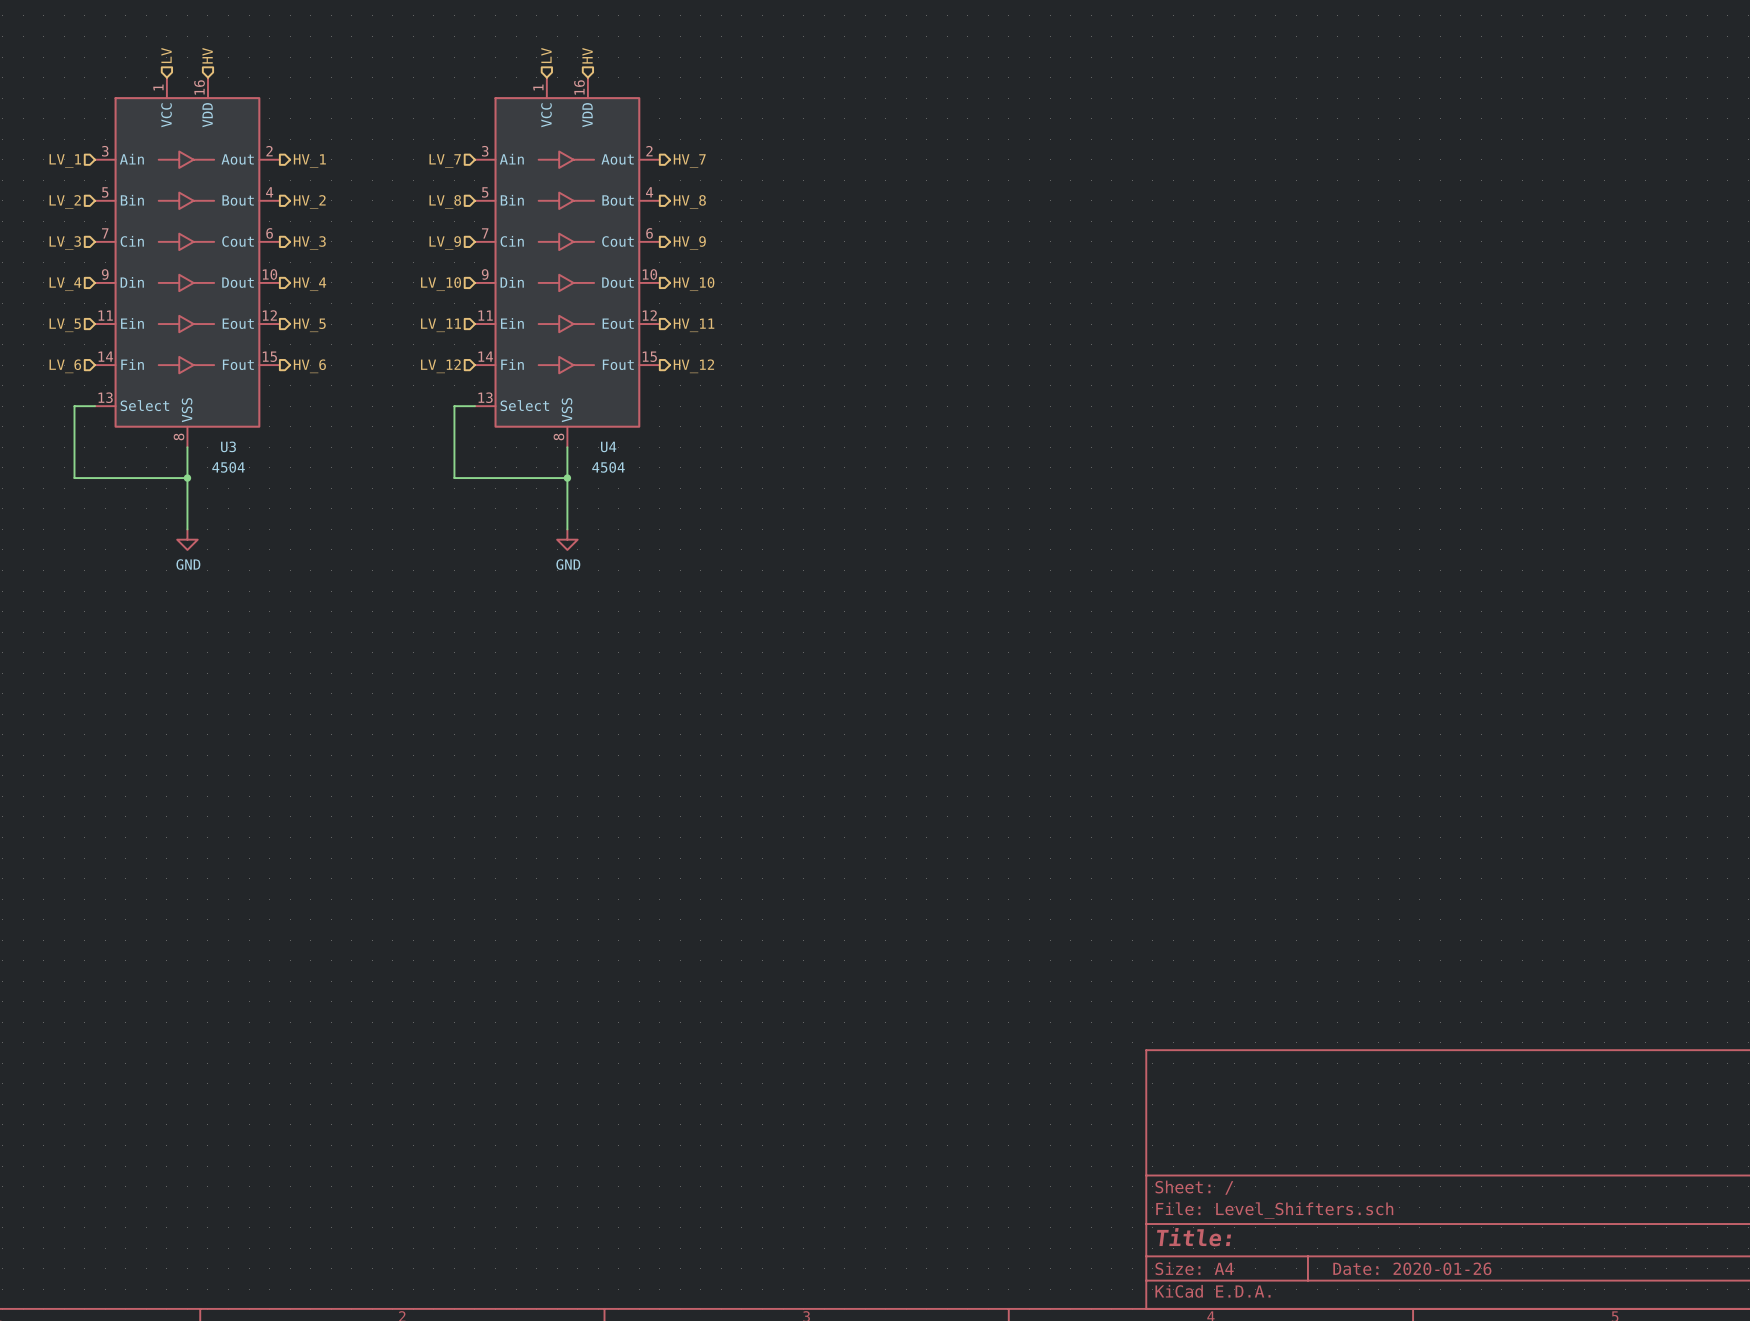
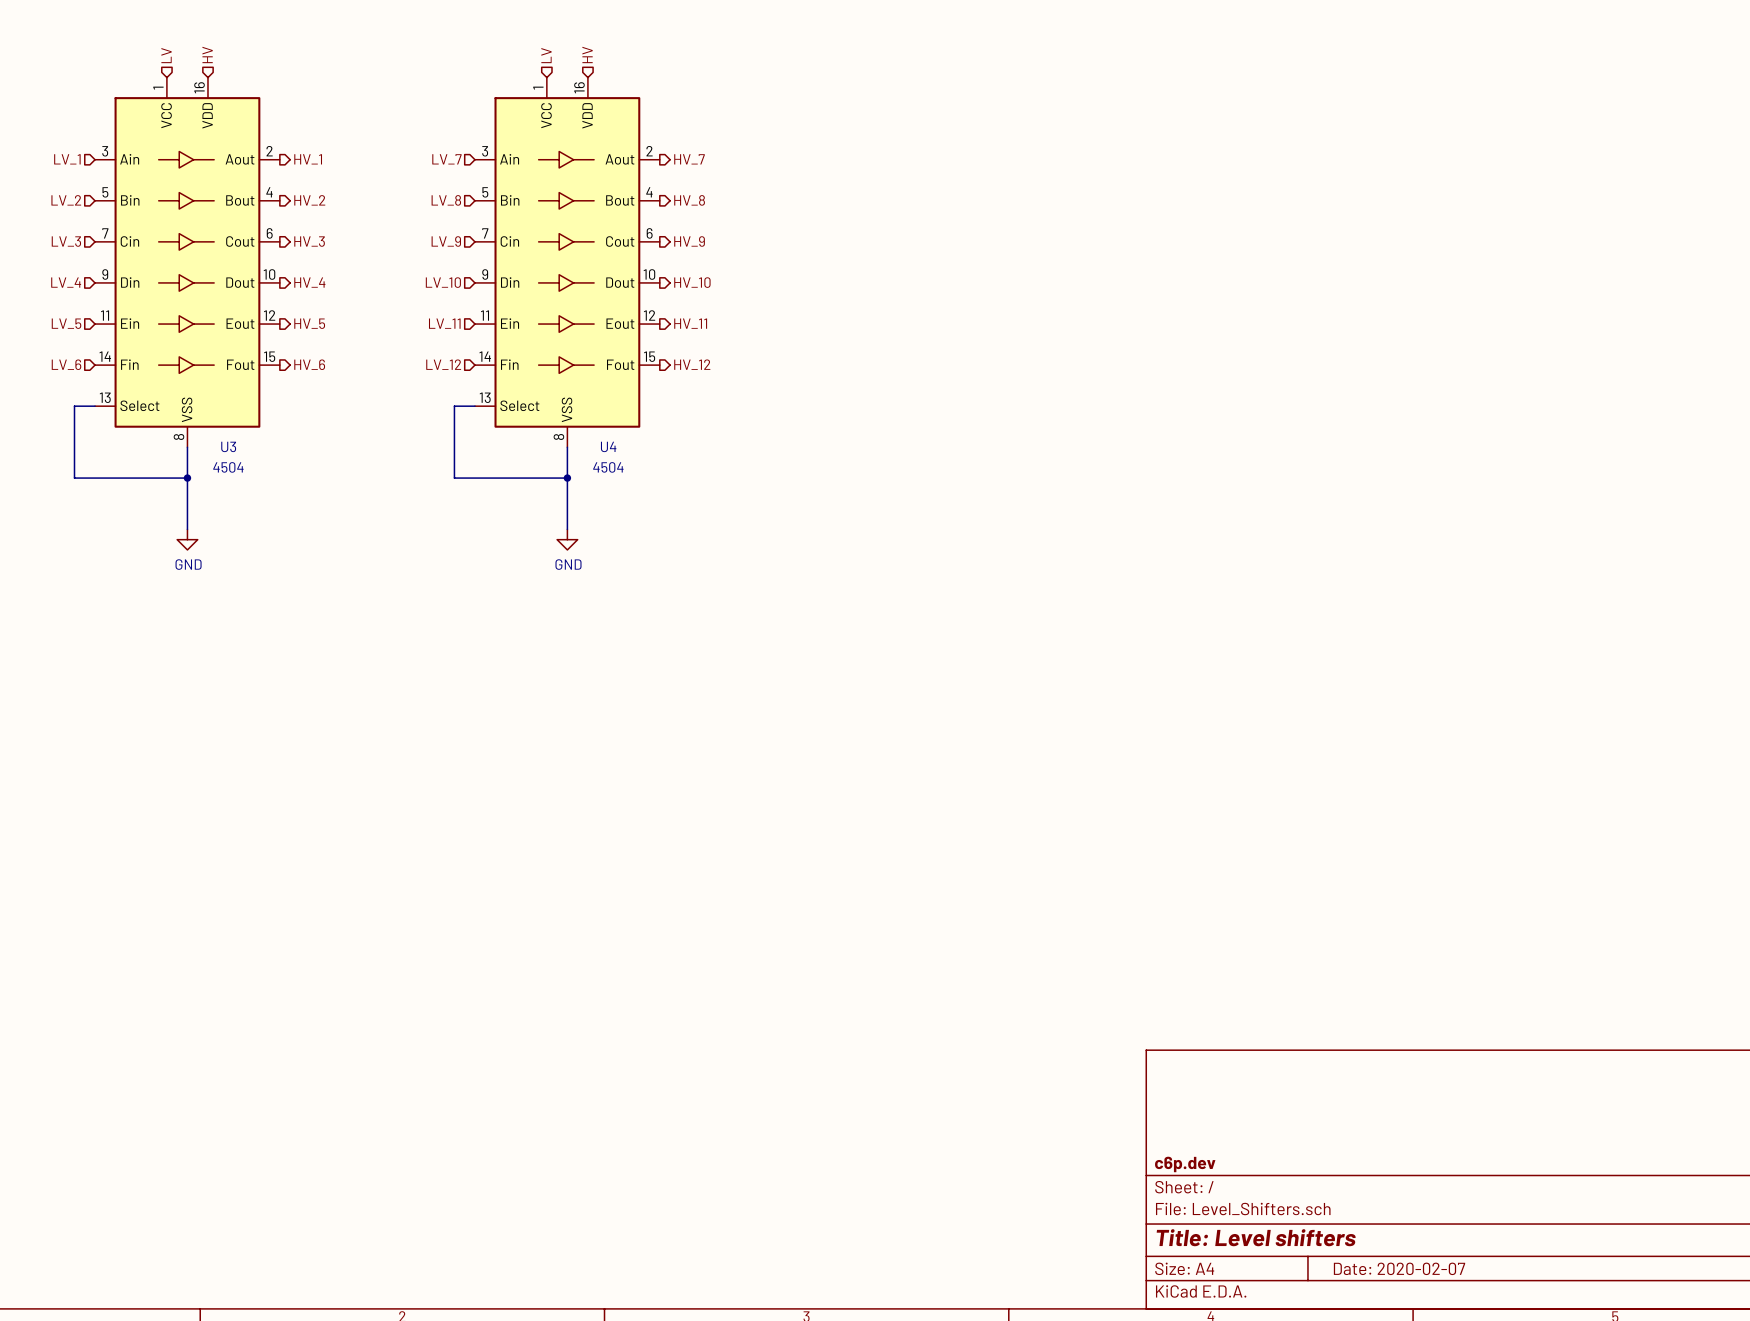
title block: none -> c6p.dev (1185, 1164)
title block: Title: (1194, 1237) -> Title: Level shifters (1256, 1237)
title block: Date: 2020-01-26 (1412, 1268) -> Date: 2020-02-07 (1399, 1268)

